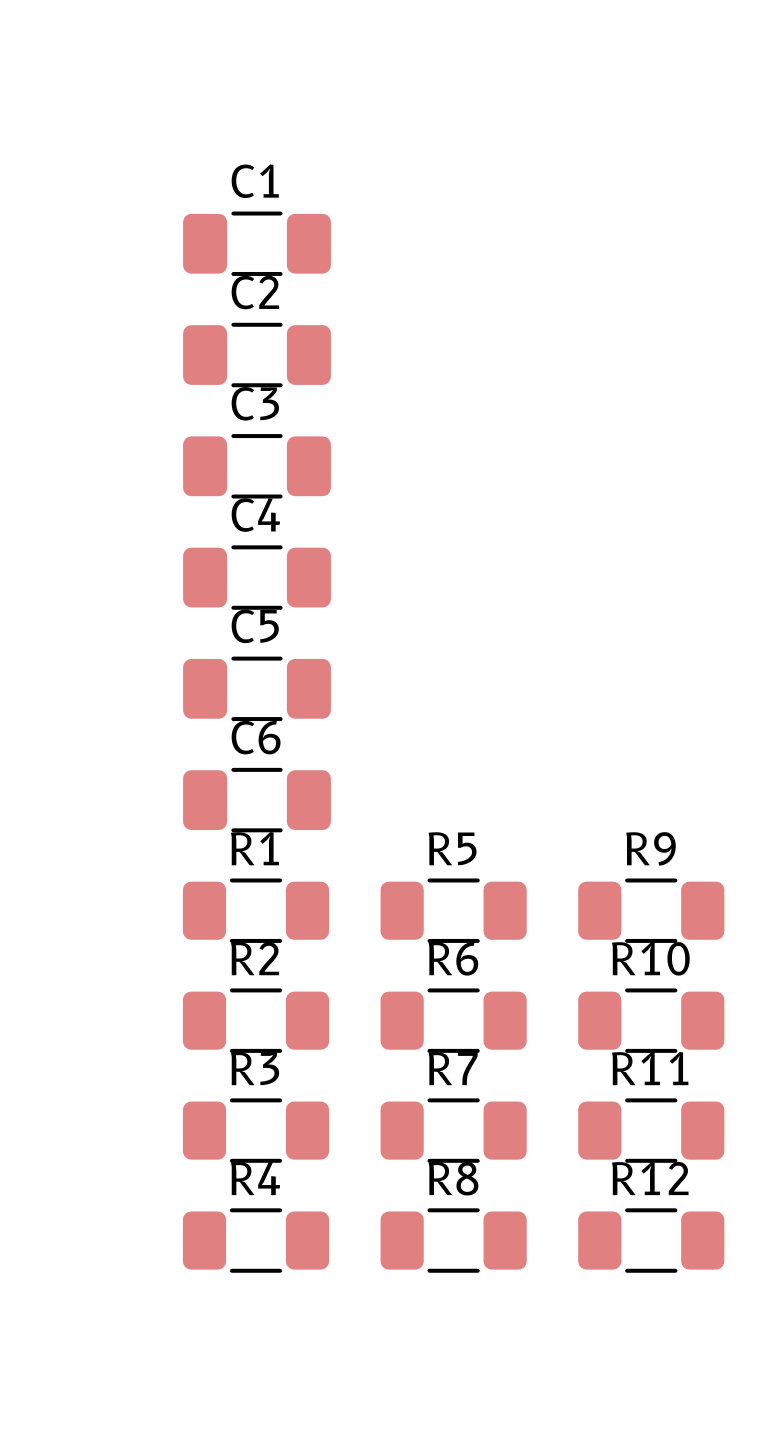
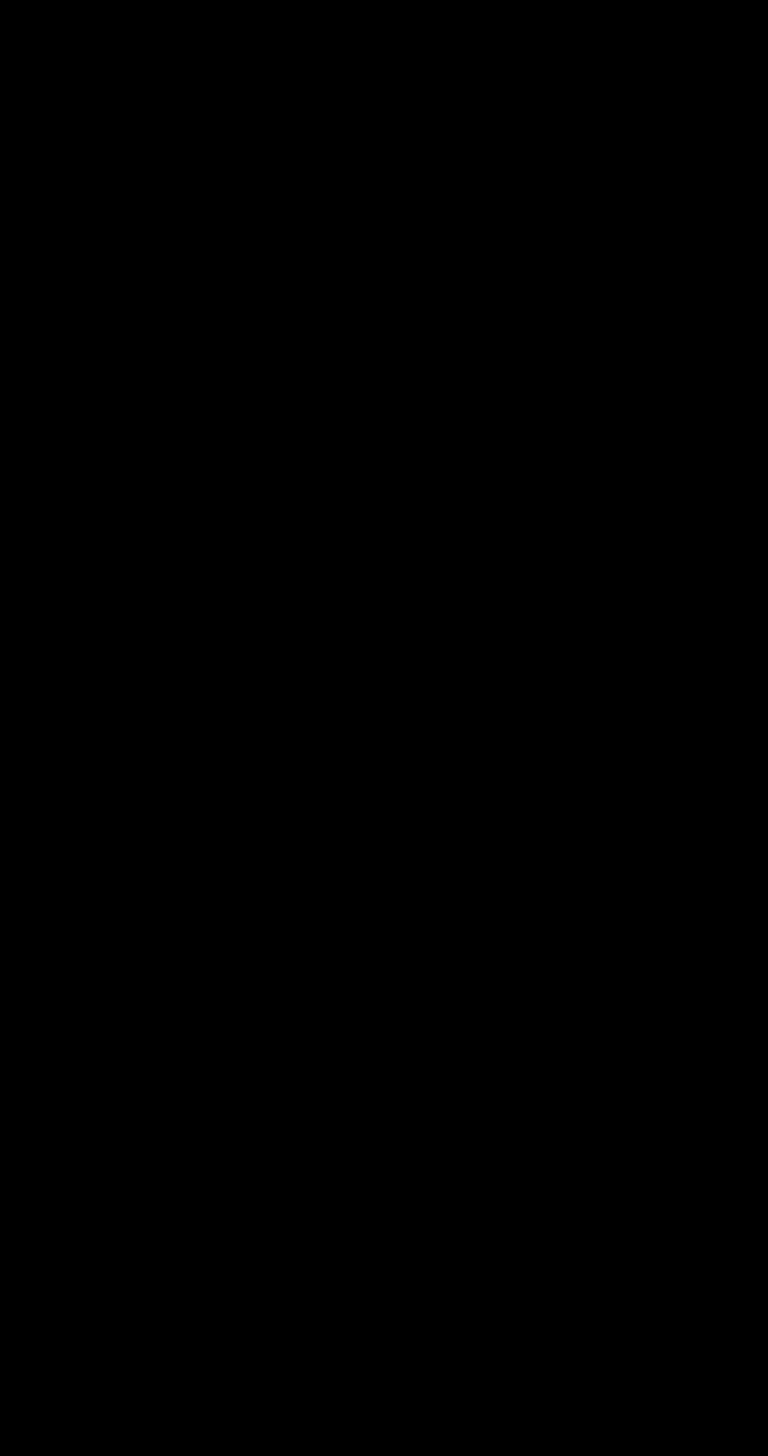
C1: (257, 243) -> none
C2: (257, 355) -> none
C3: (257, 466) -> none
C4: (257, 577) -> none
C5: (257, 688) -> none
C6: (257, 800) -> none
R1: (256, 910) -> none
R5: (453, 910) -> none
R9: (651, 910) -> none
R2: (256, 1020) -> none
R6: (453, 1020) -> none
R10: (651, 1020) -> none
R3: (256, 1130) -> none
R7: (453, 1130) -> none
R11: (651, 1130) -> none
R4: (256, 1240) -> none
R8: (453, 1240) -> none
R12: (651, 1240) -> none

